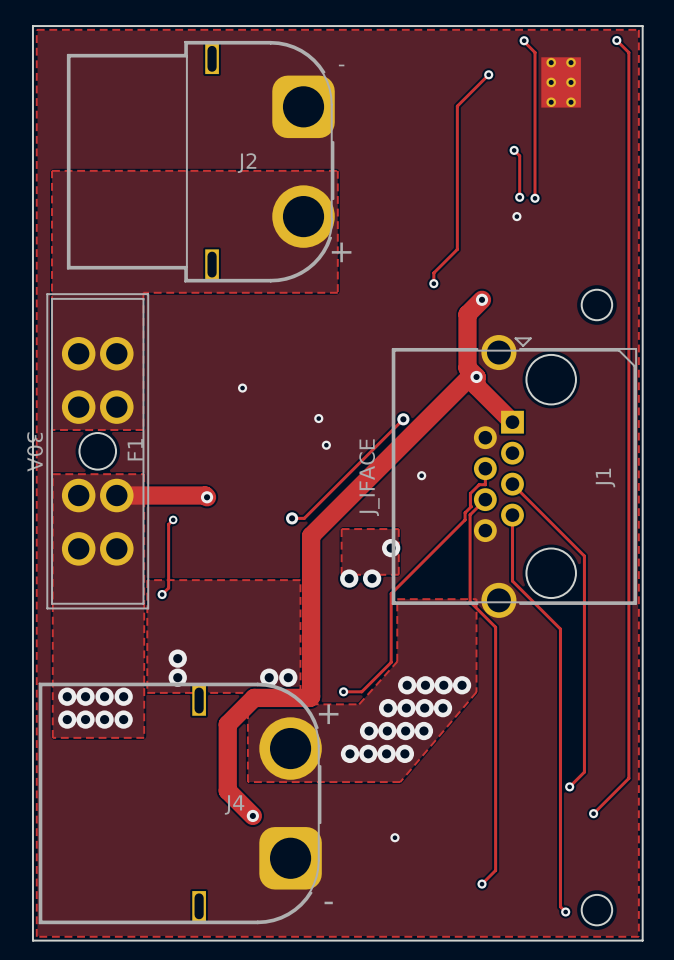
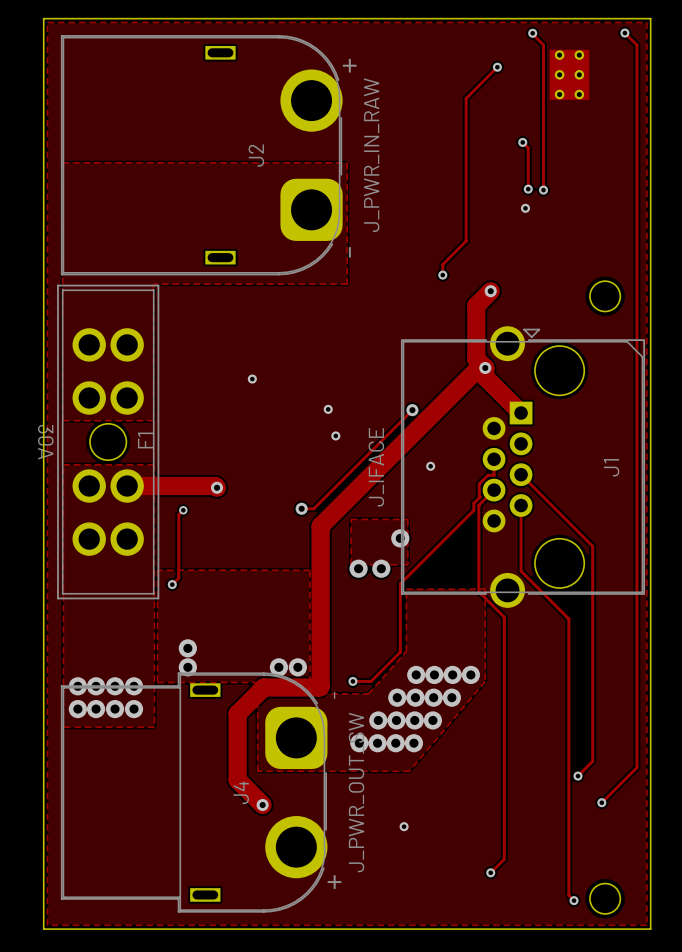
J2 footprint: [66, 40, 335, 283] -> [60, 35, 343, 276]
J2 value: none -> J_PWR_IN_RAW (371, 155)
J4 footprint: [38, 682, 322, 925] -> [60, 672, 328, 913]
J4 value: none -> J_PWR_OUT_SW (356, 792)

